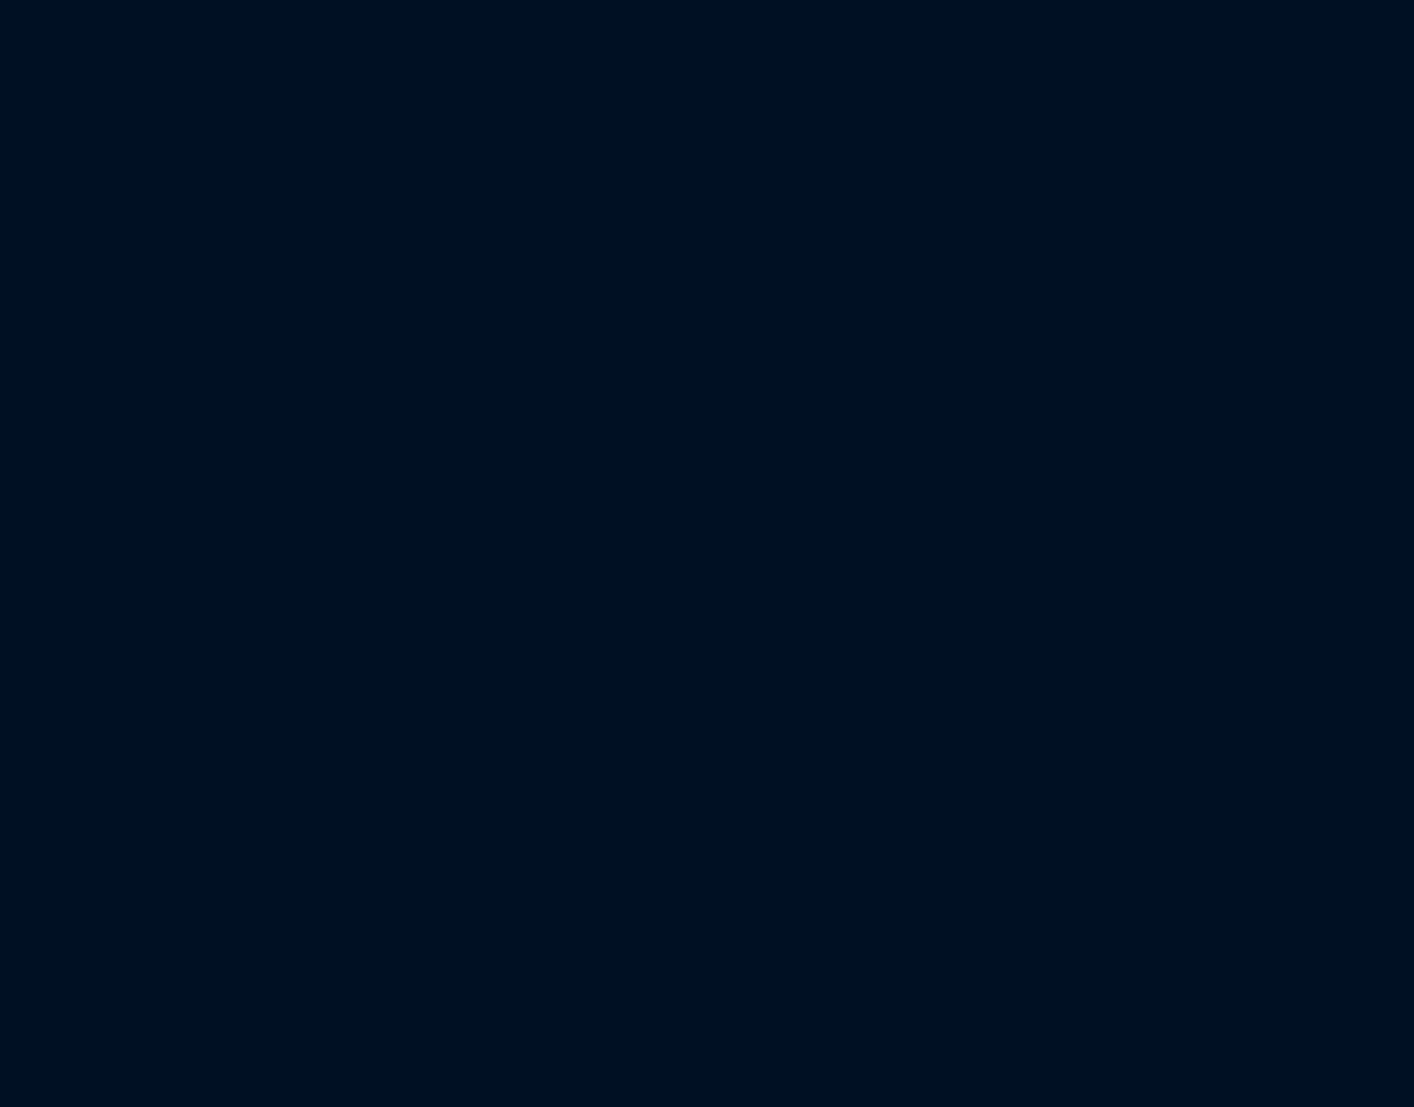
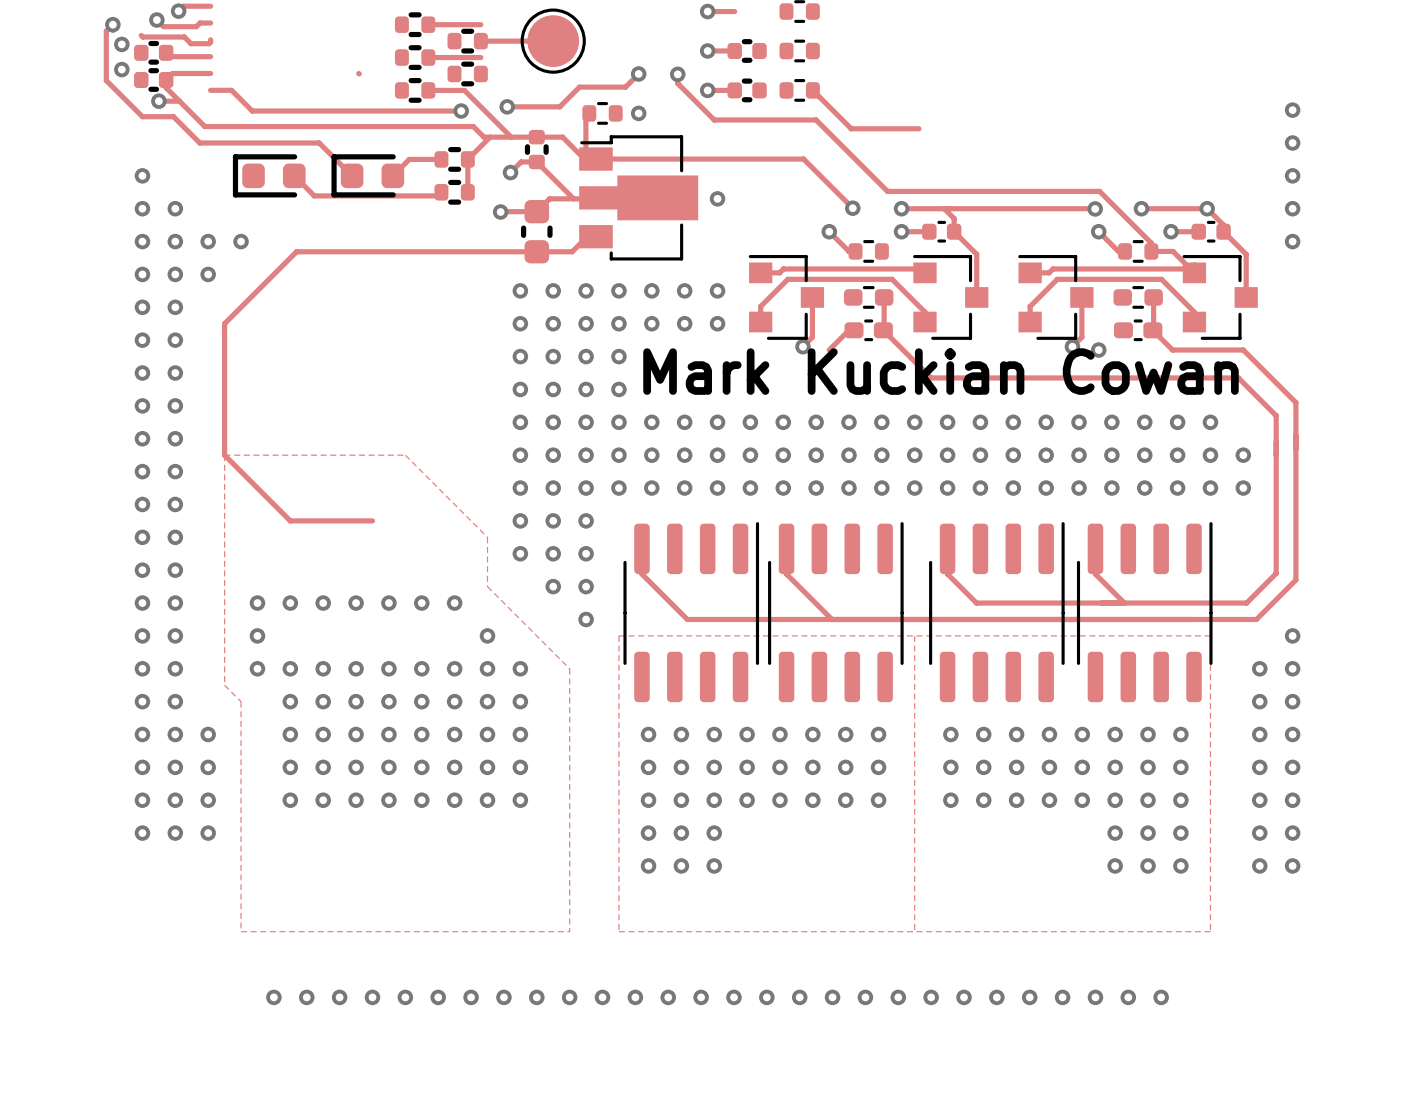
track: none -> (210, 6) (183, 6) (178, 11)
via: none -> (178, 11)
track: none -> (707, 11) (734, 11)
via: none -> (707, 11)
part: none -> (799, 11)
track: none -> (156, 19) (163, 26) (196, 26) (199, 23) (210, 23)
via: none -> (156, 19)
via: none -> (112, 24)
part: none -> (415, 24)
track: none -> (428, 24) (480, 24)
track: none -> (112, 30) (112, 24) (106, 31) (106, 80) (142, 116) (173, 116) (199, 142) (319, 142) (352, 175)
track: none -> (141, 35) (184, 37) (191, 43) (208, 43) (210, 39)
part: none -> (467, 41)
track: none -> (480, 41) (553, 41)
part: none -> (553, 41)
via: none -> (121, 44)
track: none -> (707, 50) (734, 50)
via: none -> (707, 50)
part: none -> (747, 50)
part: none -> (799, 50)
part: none -> (153, 52)
track: none -> (166, 52) (169, 56) (210, 56)
part: none -> (415, 57)
track: none -> (428, 57) (480, 57)
via: none -> (121, 69)
track: none -> (210, 73) (172, 73) (166, 79) (166, 87) (204, 126) (473, 126) (483, 137) (562, 137) (585, 160) (585, 116) (589, 113)
track: none -> (358, 73) (359, 73)
part: none -> (467, 73)
track: none -> (638, 73) (625, 87) (579, 87) (559, 106) (507, 106)
via: none -> (638, 73)
track: none -> (677, 74) (677, 83) (714, 119) (816, 119) (887, 191) (1099, 191) (1151, 243) (1151, 251) (1173, 251) (1194, 272) (1194, 264)
via: none -> (677, 74)
part: none -> (153, 79)
track: none -> (210, 90) (231, 90) (252, 111) (461, 111)
part: none -> (415, 90)
track: none -> (428, 90) (464, 90) (511, 137)
track: none -> (707, 90) (734, 90)
via: none -> (707, 90)
part: none -> (747, 90)
part: none -> (799, 90)
track: none -> (812, 90) (851, 128) (918, 128)
track: none -> (158, 101) (179, 101)
via: none -> (158, 101)
via: none -> (507, 106)
via: none -> (1292, 110)
via: none -> (461, 111)
part: none -> (602, 113)
via: none -> (638, 113)
track: none -> (490, 137) (467, 159) (467, 192)
via: none -> (1292, 142)
part: none -> (536, 149)
track: none -> (441, 159) (409, 159) (392, 175)
part: none -> (454, 159)
track: none -> (595, 159) (803, 159) (852, 208)
track: none -> (510, 172) (521, 161) (536, 161) (573, 198)
via: none -> (510, 172)
via: none -> (142, 175)
part: none -> (269, 175)
track: none -> (294, 175) (314, 195) (437, 195) (441, 192)
part: none -> (367, 175)
via: none -> (1292, 175)
part: none -> (454, 192)
part: none -> (638, 197)
track: none -> (594, 198) (549, 198) (536, 211) (504, 211)
via: none -> (717, 198)
via: none -> (142, 208)
via: none -> (175, 208)
via: none -> (852, 208)
track: none -> (901, 208) (1094, 208)
via: none -> (901, 208)
track: none -> (944, 208) (954, 218) (954, 231) (976, 254) (976, 297)
via: none -> (1095, 208)
track: none -> (1141, 208) (1207, 208) (1223, 225) (1223, 231) (1246, 254) (1246, 297)
via: none -> (1141, 208)
via: none -> (1207, 208)
via: none -> (1292, 208)
via: none -> (500, 212)
part: none -> (536, 231)
track: none -> (829, 231) (848, 251) (855, 251)
via: none -> (829, 231)
track: none -> (901, 231) (929, 231)
via: none -> (901, 231)
part: none -> (941, 231)
track: none -> (1098, 231) (1118, 251) (1124, 251)
via: none -> (1098, 231)
track: none -> (1171, 231) (1198, 231)
via: none -> (1171, 231)
part: none -> (1211, 231)
track: none -> (585, 238) (572, 251) (296, 251) (224, 323) (224, 455) (290, 520) (372, 520)
via: none -> (142, 241)
via: none -> (175, 241)
via: none -> (208, 241)
via: none -> (241, 241)
via: none -> (1292, 241)
part: none -> (868, 251)
part: none -> (1138, 251)
track: none -> (921, 268) (783, 268) (779, 272) (760, 272)
track: none -> (1190, 268) (1053, 268) (1049, 272) (1030, 272)
via: none -> (142, 274)
via: none -> (175, 274)
via: none -> (208, 274)
via: none -> (520, 290)
via: none -> (553, 290)
via: none -> (586, 290)
via: none -> (618, 290)
via: none -> (651, 290)
via: none -> (684, 290)
via: none -> (717, 290)
part: none -> (786, 297)
track: none -> (812, 297) (812, 337) (802, 346)
part: none -> (868, 297)
track: none -> (884, 297) (883, 330) (931, 377) (1238, 377) (1276, 415) (1276, 573) (1246, 603) (976, 603) (947, 574) (947, 548)
part: none -> (950, 297)
part: none -> (1055, 297)
track: none -> (1081, 297) (1081, 337) (1072, 346)
part: none -> (1138, 297)
track: none -> (1153, 297) (1152, 330) (1172, 350) (1243, 350) (1295, 402) (1295, 580) (1256, 619) (687, 619) (641, 574) (641, 548)
part: none -> (1220, 297)
via: none -> (142, 307)
via: none -> (175, 307)
track: none -> (760, 322) (760, 306) (787, 279) (892, 279) (924, 312) (924, 322)
track: none -> (1030, 322) (1030, 306) (1057, 279) (1161, 279) (1194, 312) (1194, 322)
via: none -> (520, 323)
via: none -> (553, 323)
via: none -> (586, 323)
via: none -> (618, 323)
via: none -> (651, 323)
via: none -> (684, 323)
via: none -> (717, 323)
track: none -> (854, 330) (848, 330) (829, 350)
part: none -> (868, 330)
part: none -> (1138, 330)
via: none -> (142, 340)
via: none -> (175, 340)
via: none -> (802, 346)
via: none -> (1072, 346)
via: none -> (1098, 350)
via: none -> (520, 356)
via: none -> (553, 356)
via: none -> (586, 356)
via: none -> (618, 356)
text: none -> Mark Kuckian Cowan (941, 371)
via: none -> (142, 373)
via: none -> (175, 373)
via: none -> (520, 389)
via: none -> (553, 389)
via: none -> (586, 389)
via: none -> (618, 389)
via: none -> (142, 405)
via: none -> (175, 405)
via: none -> (520, 422)
via: none -> (553, 422)
via: none -> (586, 422)
via: none -> (618, 422)
via: none -> (651, 422)
via: none -> (684, 422)
via: none -> (717, 422)
via: none -> (750, 422)
via: none -> (783, 422)
via: none -> (816, 422)
via: none -> (848, 422)
via: none -> (881, 422)
via: none -> (914, 422)
via: none -> (947, 422)
via: none -> (980, 422)
via: none -> (1013, 422)
via: none -> (1046, 422)
via: none -> (1079, 422)
via: none -> (1111, 422)
via: none -> (1144, 422)
via: none -> (1177, 422)
via: none -> (1210, 422)
via: none -> (142, 438)
via: none -> (175, 438)
zone outline: none -> (224, 455) (224, 685) (241, 701) (241, 931) (569, 931) (569, 668) (487, 586) (487, 537) (405, 455) (224, 455)
via: none -> (520, 455)
via: none -> (553, 455)
via: none -> (586, 455)
via: none -> (618, 455)
via: none -> (651, 455)
via: none -> (684, 455)
via: none -> (717, 455)
via: none -> (750, 455)
via: none -> (783, 455)
via: none -> (816, 455)
via: none -> (848, 455)
via: none -> (881, 455)
via: none -> (914, 455)
via: none -> (947, 455)
via: none -> (980, 455)
via: none -> (1013, 455)
via: none -> (1046, 455)
via: none -> (1079, 455)
via: none -> (1111, 455)
via: none -> (1144, 455)
via: none -> (1177, 455)
via: none -> (1210, 455)
via: none -> (1243, 455)
via: none -> (142, 471)
via: none -> (175, 471)
via: none -> (520, 488)
via: none -> (553, 488)
via: none -> (586, 488)
via: none -> (618, 488)
via: none -> (651, 488)
via: none -> (684, 488)
via: none -> (717, 488)
via: none -> (750, 488)
via: none -> (783, 488)
via: none -> (816, 488)
via: none -> (848, 488)
via: none -> (881, 488)
via: none -> (914, 488)
via: none -> (947, 488)
via: none -> (980, 488)
via: none -> (1013, 488)
via: none -> (1046, 488)
via: none -> (1079, 488)
via: none -> (1111, 488)
via: none -> (1144, 488)
via: none -> (1177, 488)
via: none -> (1210, 488)
via: none -> (1243, 488)
via: none -> (142, 504)
via: none -> (175, 504)
via: none -> (520, 520)
via: none -> (553, 520)
via: none -> (586, 520)
via: none -> (142, 537)
via: none -> (175, 537)
track: none -> (786, 548) (786, 574) (831, 619)
track: none -> (1095, 548) (1095, 574) (1124, 603)
via: none -> (520, 553)
via: none -> (553, 553)
via: none -> (586, 553)
via: none -> (142, 570)
via: none -> (175, 570)
via: none -> (553, 586)
via: none -> (586, 586)
via: none -> (142, 603)
via: none -> (175, 603)
via: none -> (257, 603)
via: none -> (290, 603)
via: none -> (323, 603)
via: none -> (356, 603)
via: none -> (388, 603)
via: none -> (421, 603)
via: none -> (454, 603)
part: none -> (691, 612)
part: none -> (835, 612)
part: none -> (996, 612)
part: none -> (1144, 612)
via: none -> (586, 619)
via: none -> (142, 635)
via: none -> (175, 635)
via: none -> (257, 635)
via: none -> (487, 635)
zone outline: none -> (618, 635) (618, 931) (1210, 931) (1210, 635) (618, 635)
zone outline: none -> (914, 635) (914, 931)
via: none -> (1292, 635)
via: none -> (142, 668)
via: none -> (175, 668)
via: none -> (257, 668)
via: none -> (290, 668)
via: none -> (323, 668)
via: none -> (356, 668)
via: none -> (388, 668)
via: none -> (421, 668)
via: none -> (454, 668)
via: none -> (487, 668)
via: none -> (520, 668)
via: none -> (1259, 668)
via: none -> (1292, 668)
via: none -> (142, 701)
via: none -> (175, 701)
via: none -> (290, 701)
via: none -> (323, 701)
via: none -> (356, 701)
via: none -> (388, 701)
via: none -> (421, 701)
via: none -> (454, 701)
via: none -> (487, 701)
via: none -> (520, 701)
via: none -> (1259, 701)
via: none -> (1292, 701)
via: none -> (142, 734)
via: none -> (175, 734)
via: none -> (208, 734)
via: none -> (290, 734)
via: none -> (323, 734)
via: none -> (356, 734)
via: none -> (388, 734)
via: none -> (421, 734)
via: none -> (454, 734)
via: none -> (487, 734)
via: none -> (520, 734)
via: none -> (648, 734)
via: none -> (681, 734)
via: none -> (714, 734)
via: none -> (747, 734)
via: none -> (779, 734)
via: none -> (812, 734)
via: none -> (845, 734)
via: none -> (878, 734)
via: none -> (950, 734)
via: none -> (983, 734)
via: none -> (1016, 734)
via: none -> (1049, 734)
via: none -> (1082, 734)
via: none -> (1115, 734)
via: none -> (1148, 734)
via: none -> (1180, 734)
via: none -> (1259, 734)
via: none -> (1292, 734)
via: none -> (142, 767)
via: none -> (175, 767)
via: none -> (208, 767)
via: none -> (290, 767)
via: none -> (323, 767)
via: none -> (356, 767)
via: none -> (388, 767)
via: none -> (421, 767)
via: none -> (454, 767)
via: none -> (487, 767)
via: none -> (520, 767)
via: none -> (648, 767)
via: none -> (681, 767)
via: none -> (714, 767)
via: none -> (747, 767)
via: none -> (779, 767)
via: none -> (812, 767)
via: none -> (845, 767)
via: none -> (878, 767)
via: none -> (950, 767)
via: none -> (983, 767)
via: none -> (1016, 767)
via: none -> (1049, 767)
via: none -> (1082, 767)
via: none -> (1115, 767)
via: none -> (1148, 767)
via: none -> (1180, 767)
via: none -> (1259, 767)
via: none -> (1292, 767)
via: none -> (142, 800)
via: none -> (175, 800)
via: none -> (208, 800)
via: none -> (290, 800)
via: none -> (323, 800)
via: none -> (356, 800)
via: none -> (388, 800)
via: none -> (421, 800)
via: none -> (454, 800)
via: none -> (487, 800)
via: none -> (520, 800)
via: none -> (648, 800)
via: none -> (681, 800)
via: none -> (714, 800)
via: none -> (747, 800)
via: none -> (779, 800)
via: none -> (812, 800)
via: none -> (845, 800)
via: none -> (878, 800)
via: none -> (950, 800)
via: none -> (983, 800)
via: none -> (1016, 800)
via: none -> (1049, 800)
via: none -> (1082, 800)
via: none -> (1115, 800)
via: none -> (1148, 800)
via: none -> (1180, 800)
via: none -> (1259, 800)
via: none -> (1292, 800)
via: none -> (142, 833)
via: none -> (175, 833)
via: none -> (208, 833)
via: none -> (648, 833)
via: none -> (681, 833)
via: none -> (714, 833)
via: none -> (1115, 833)
via: none -> (1148, 833)
via: none -> (1180, 833)
via: none -> (1259, 833)
via: none -> (1292, 833)
via: none -> (648, 865)
via: none -> (681, 865)
via: none -> (714, 865)
via: none -> (1115, 865)
via: none -> (1148, 865)
via: none -> (1180, 865)
via: none -> (1259, 865)
via: none -> (1292, 865)
via: none -> (273, 997)
via: none -> (306, 997)
via: none -> (339, 997)
via: none -> (372, 997)
via: none -> (405, 997)
via: none -> (438, 997)
via: none -> (471, 997)
via: none -> (503, 997)
via: none -> (536, 997)
via: none -> (569, 997)
via: none -> (602, 997)
via: none -> (635, 997)
via: none -> (668, 997)
via: none -> (701, 997)
via: none -> (733, 997)
via: none -> (766, 997)
via: none -> (799, 997)
via: none -> (832, 997)
via: none -> (865, 997)
via: none -> (898, 997)
via: none -> (931, 997)
via: none -> (964, 997)
via: none -> (996, 997)
via: none -> (1029, 997)
via: none -> (1062, 997)
via: none -> (1095, 997)
via: none -> (1128, 997)
via: none -> (1161, 997)

